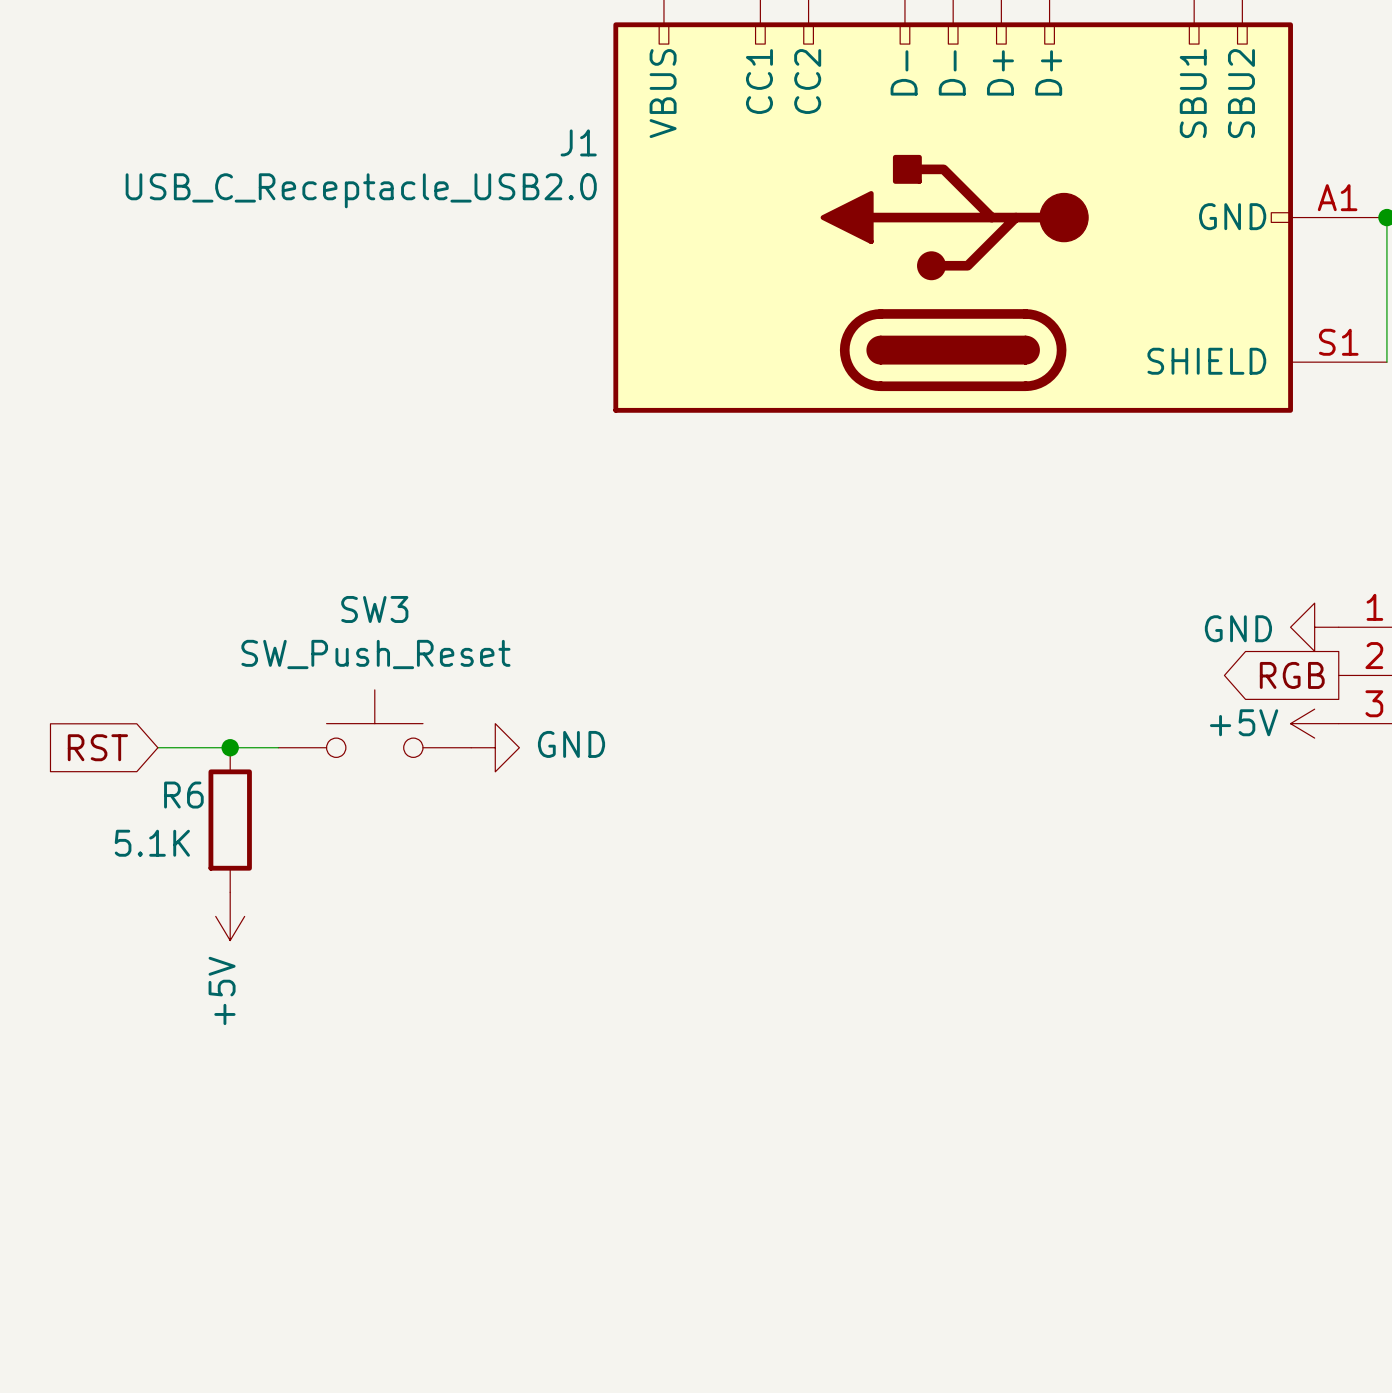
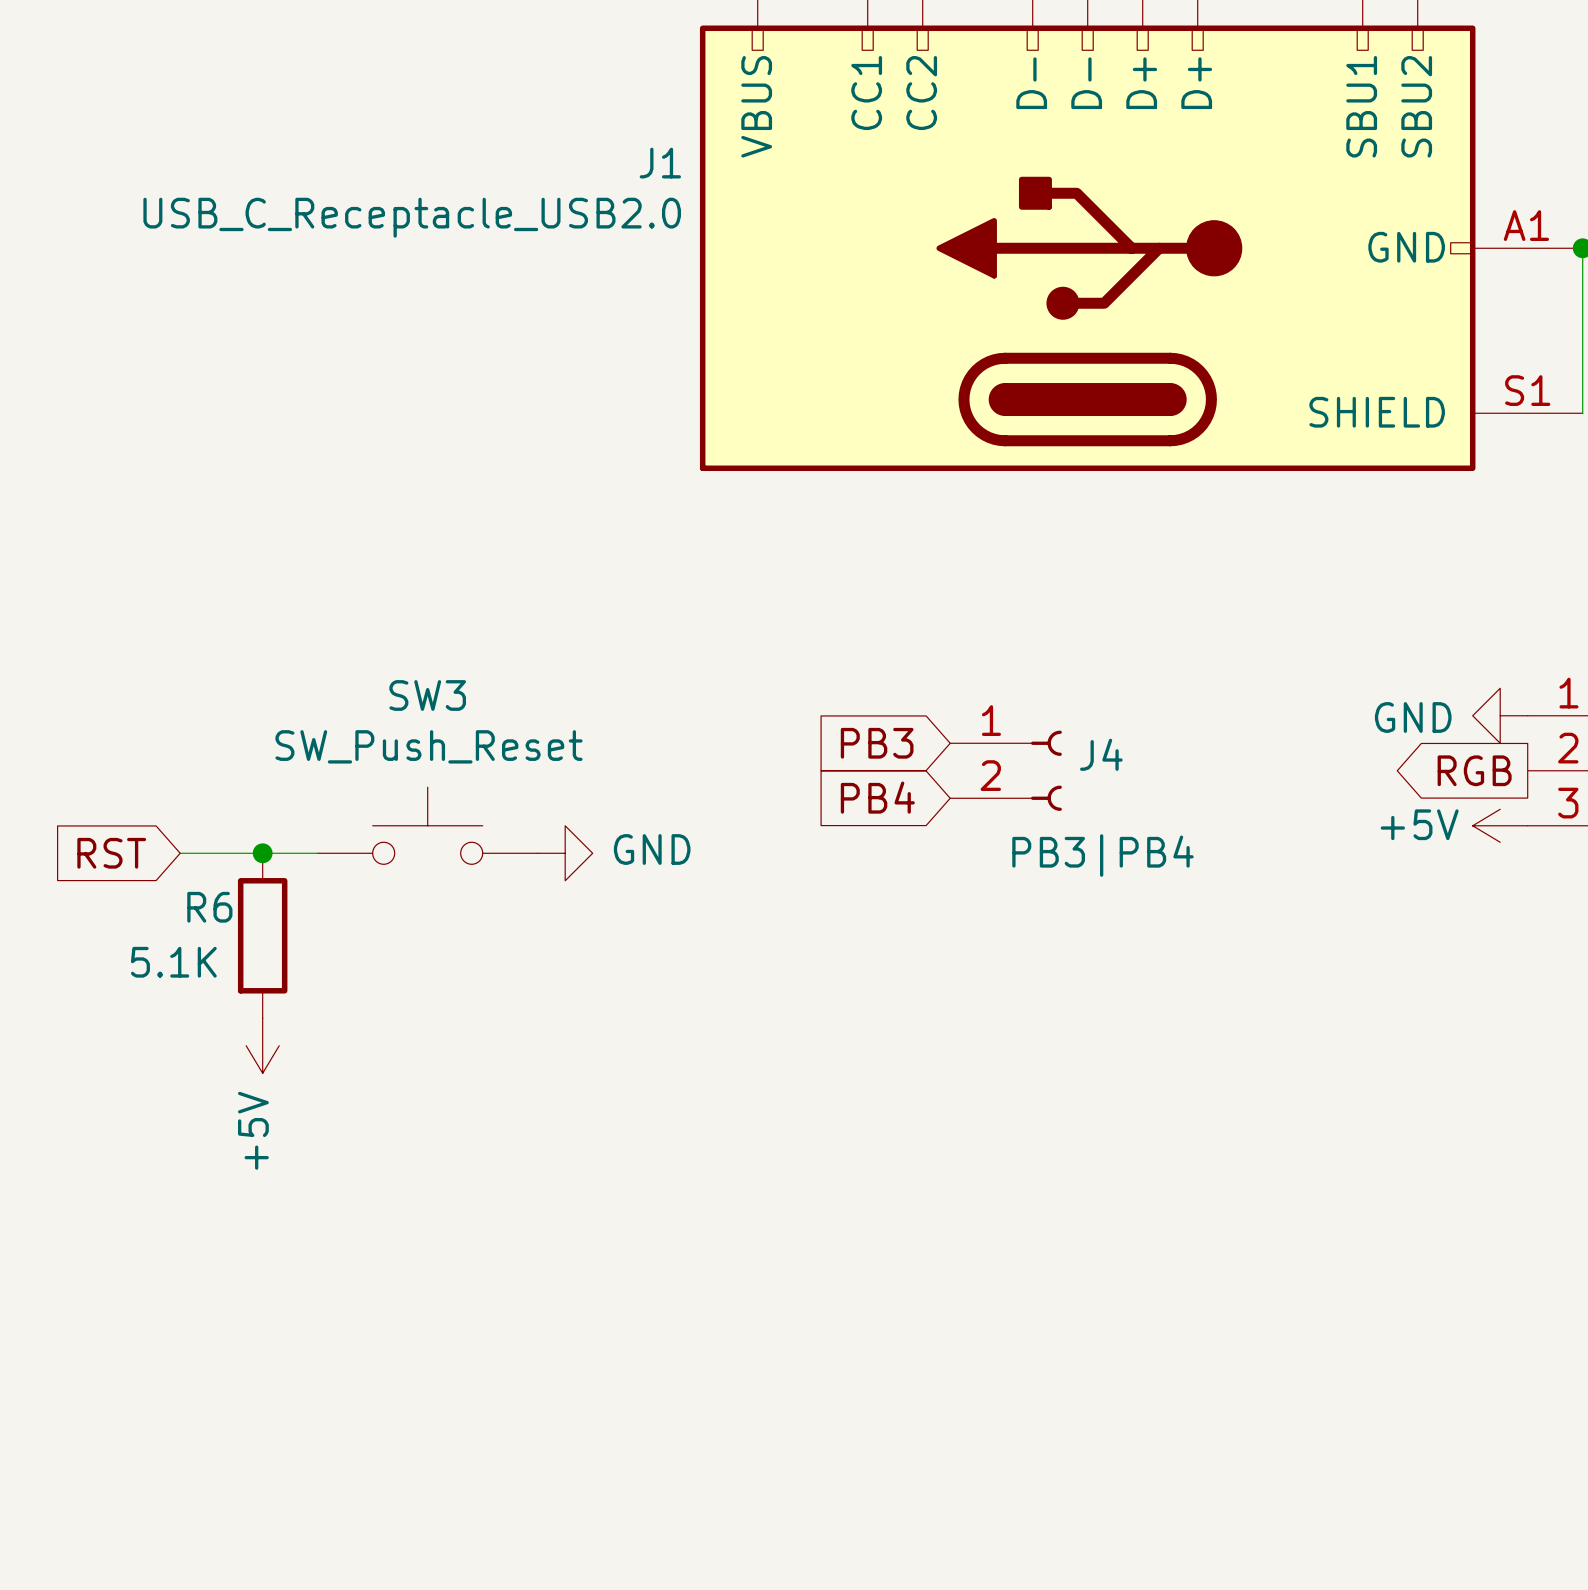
global label: none -> PB3 (877, 743)
J4: none -> PB3|PB4 (1006, 770)
global label: none -> PB4 (877, 797)

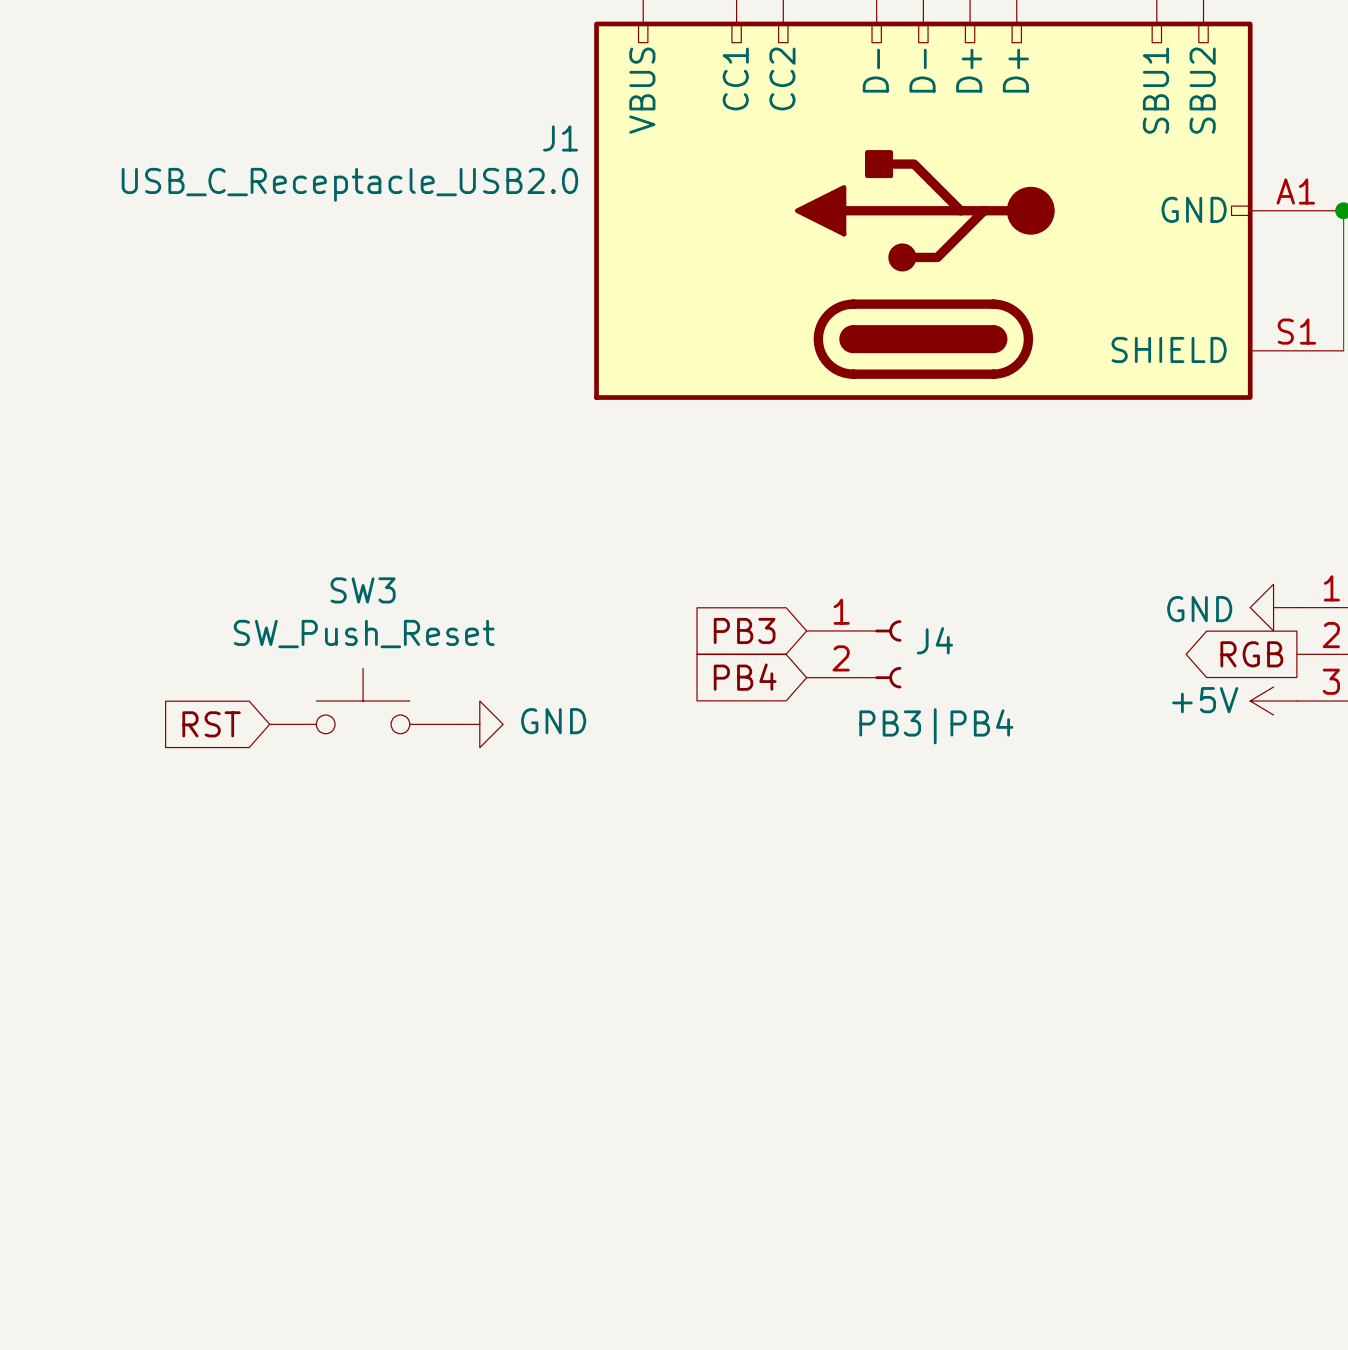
global label position: RST (111, 853) -> RST (211, 724)
wire: (180, 853) (317, 853) -> none
junction: (262, 853) -> none
R6: 5.1K (262, 935) -> none
power symbol: +5V (262, 1045) -> none

